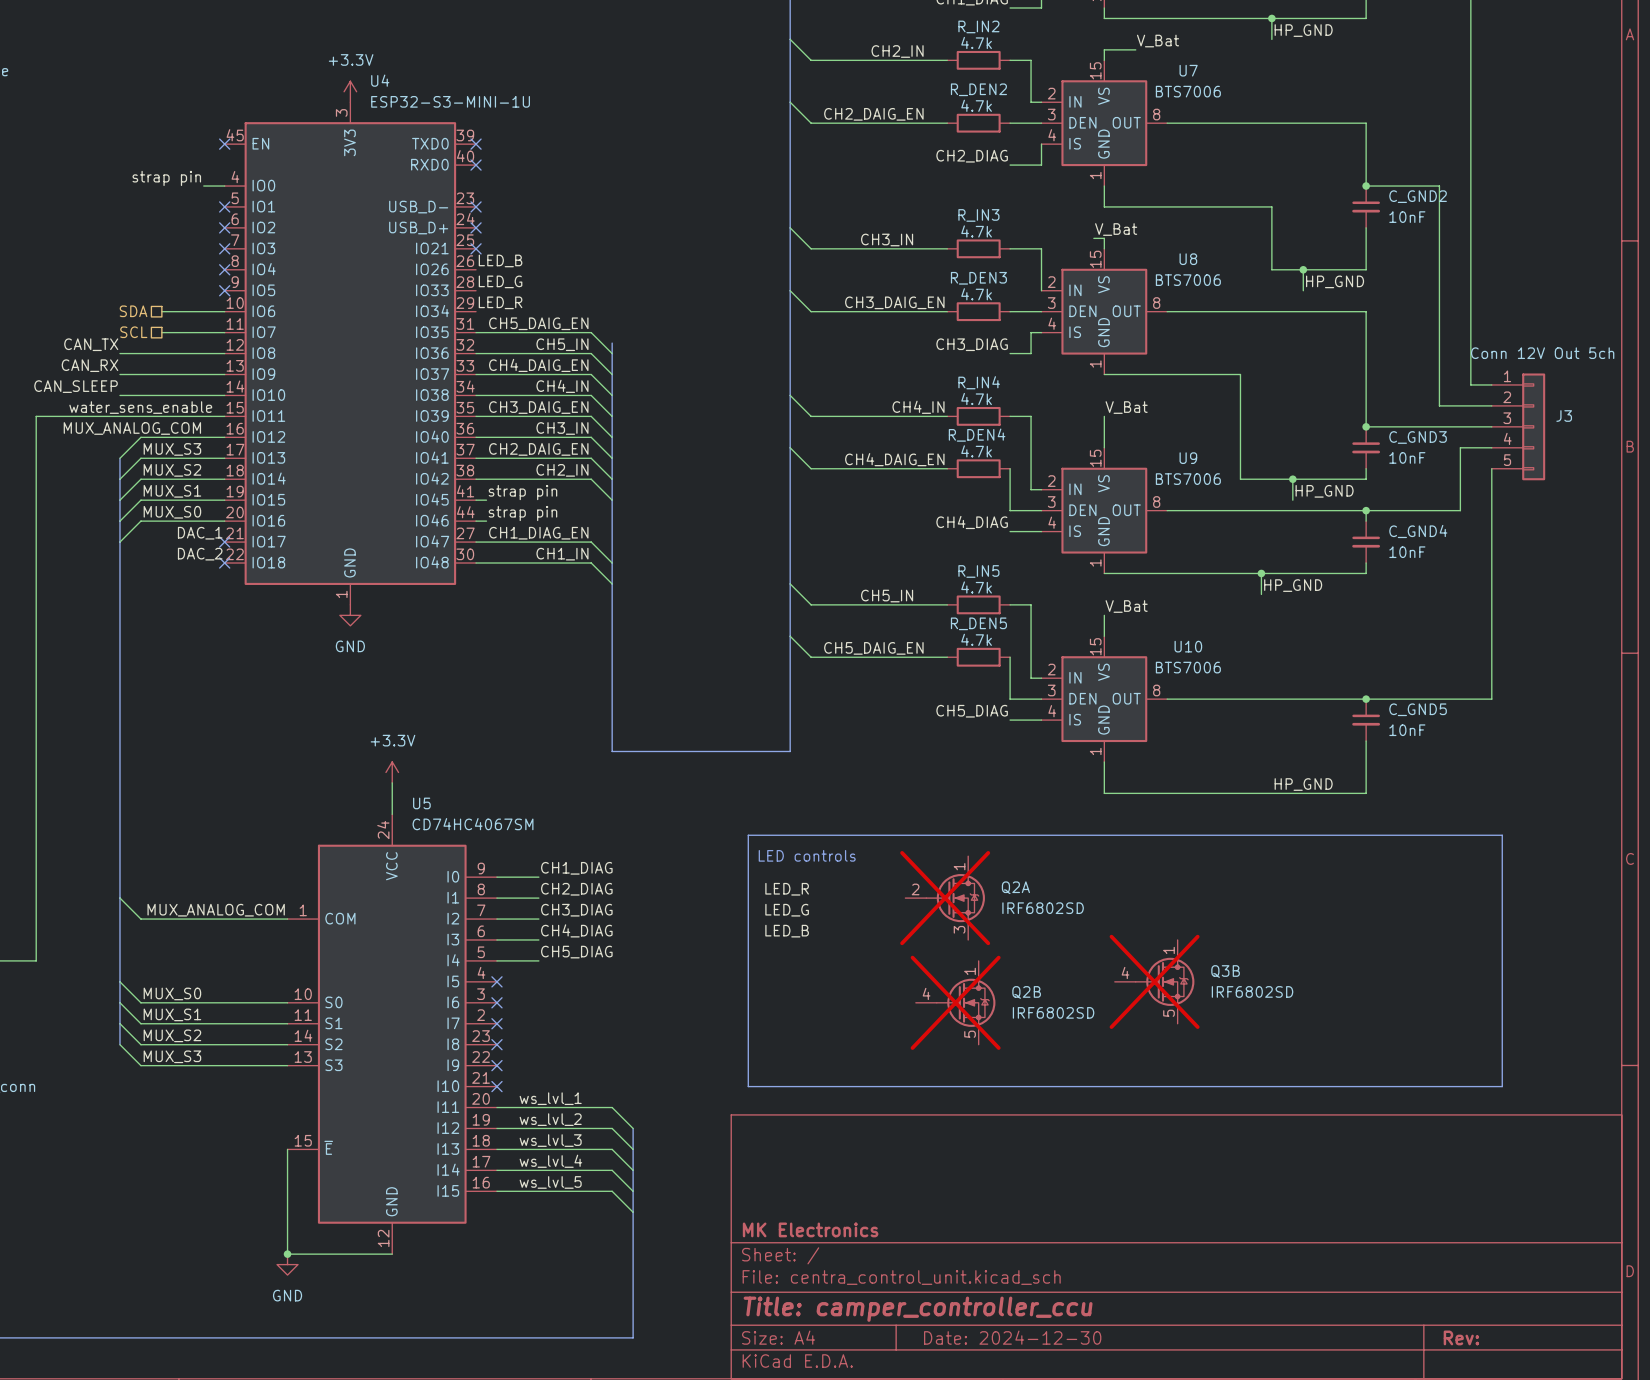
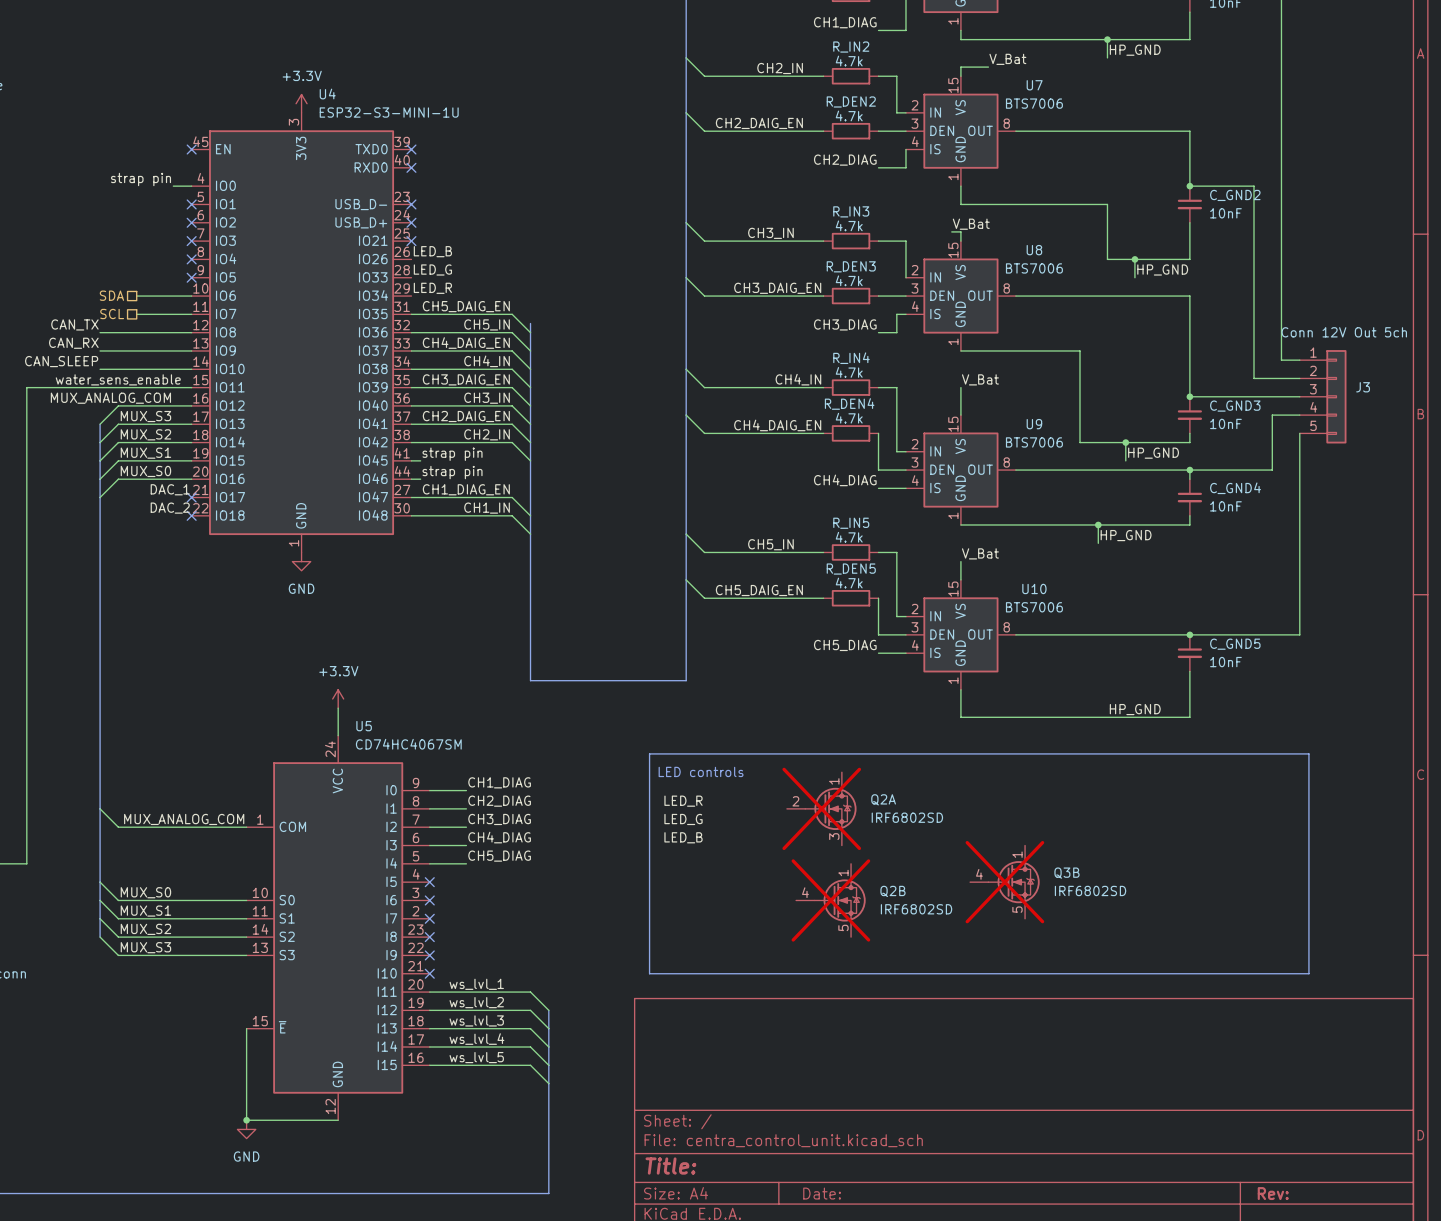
title block: MK Electronics (810, 1229) -> none
title block: Title: camper_controller_ccu (918, 1309) -> Title: (670, 1166)
title block: Date: 2024-12-30 (1012, 1337) -> Date: (822, 1193)

